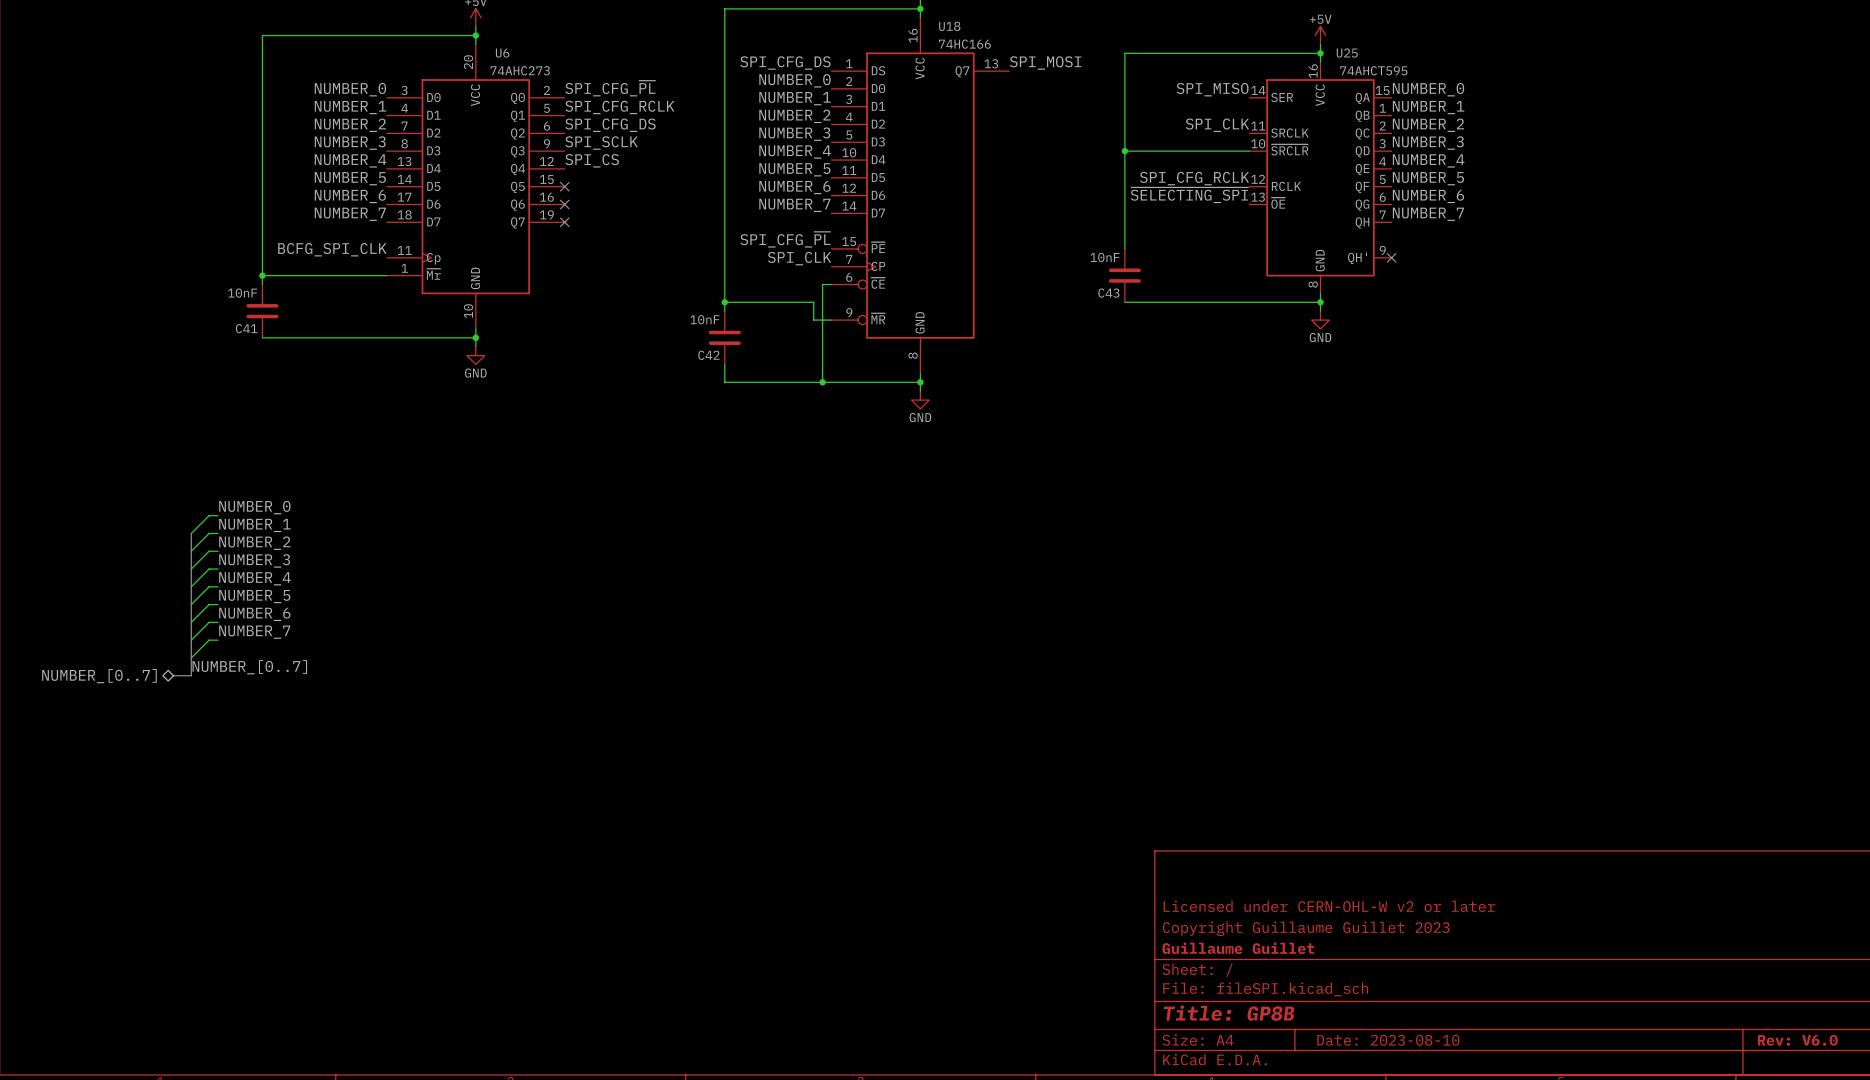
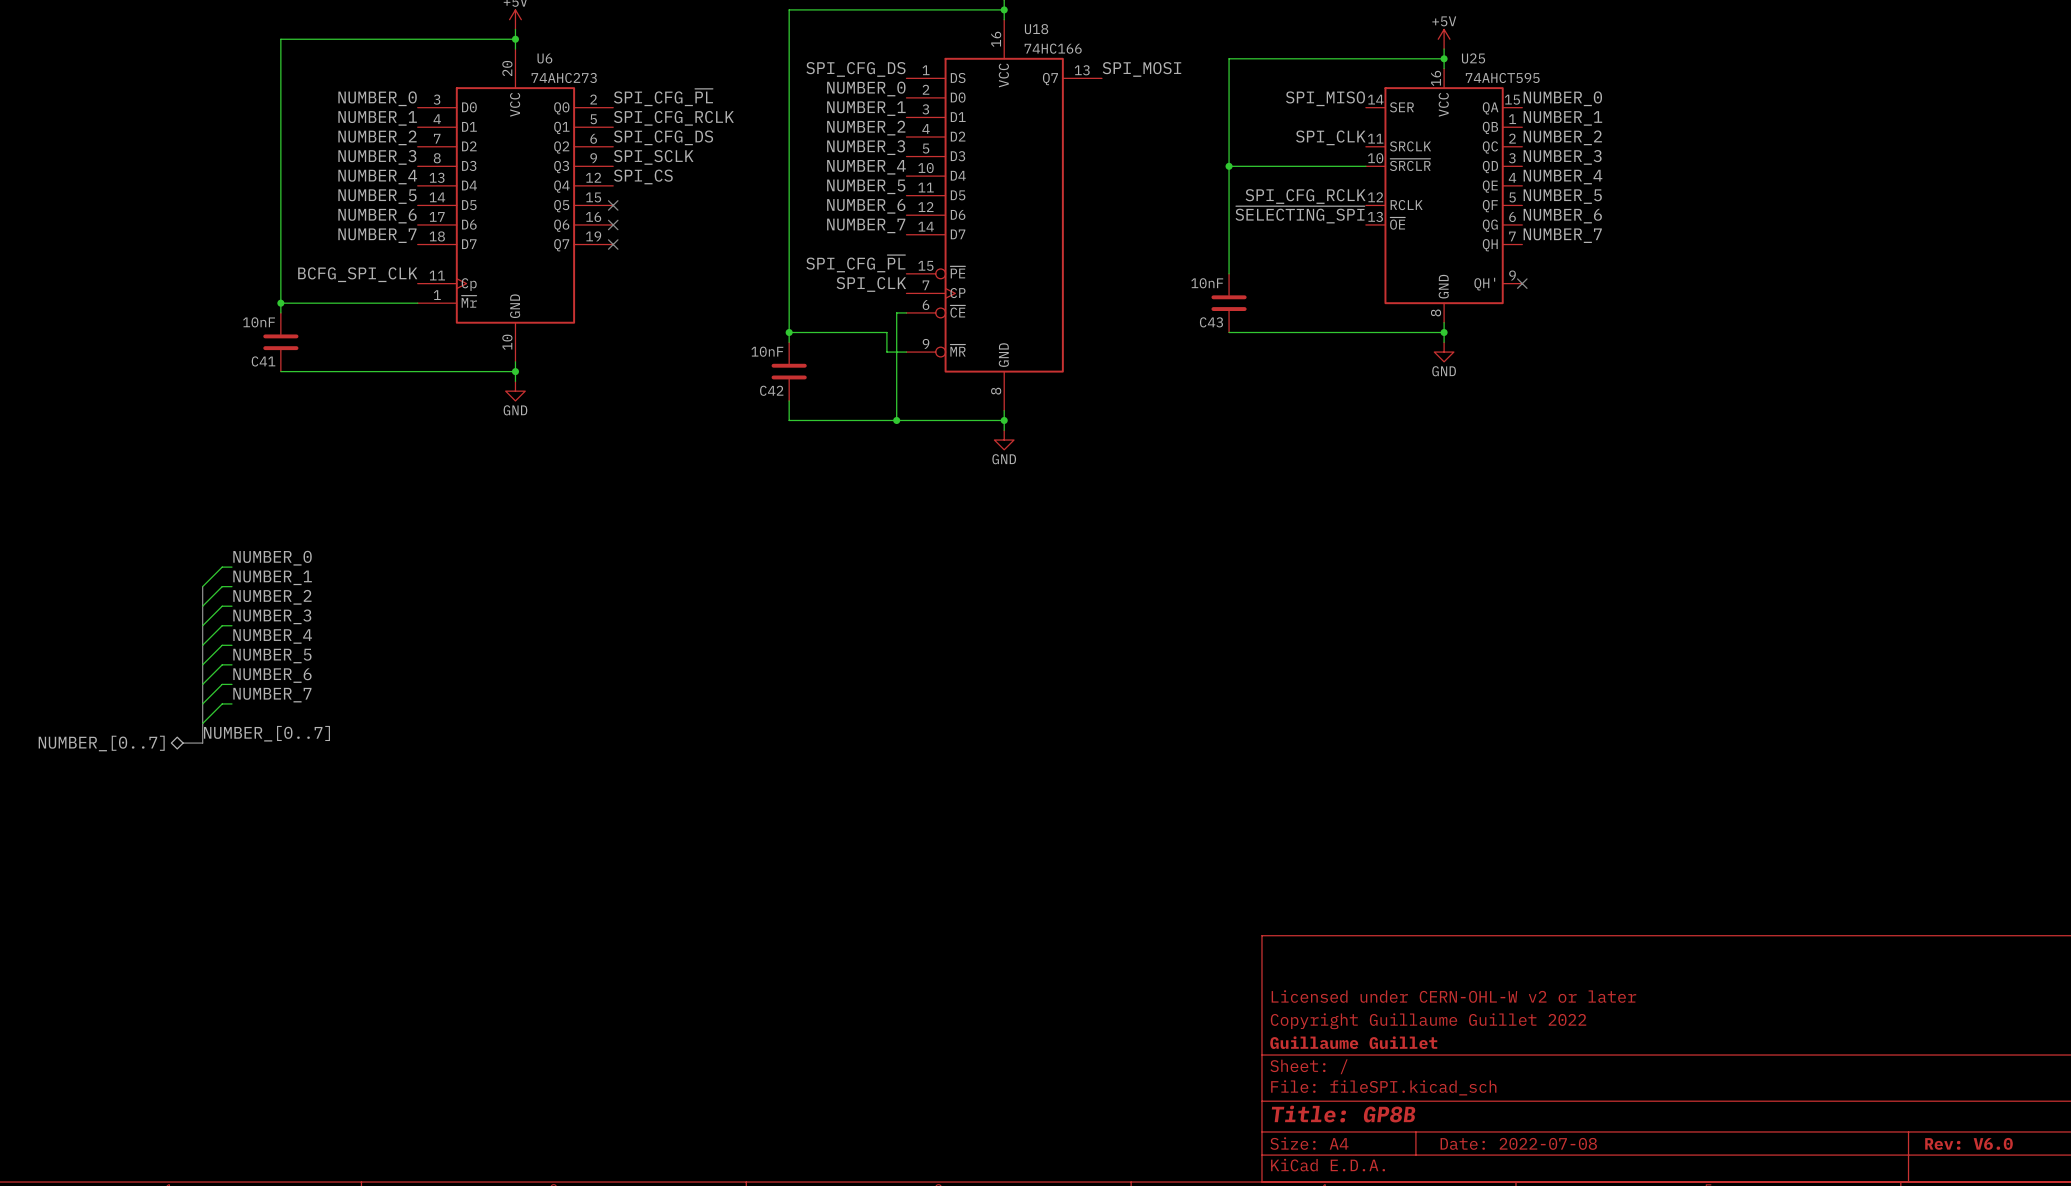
title block: Copyright Guillaume Guillet 2023 (1306, 928) -> Copyright Guillaume Guillet 2022 (1428, 1021)
title block: Date: 2023-08-10 (1388, 1040) -> Date: 2022-07-08 (1518, 1143)

